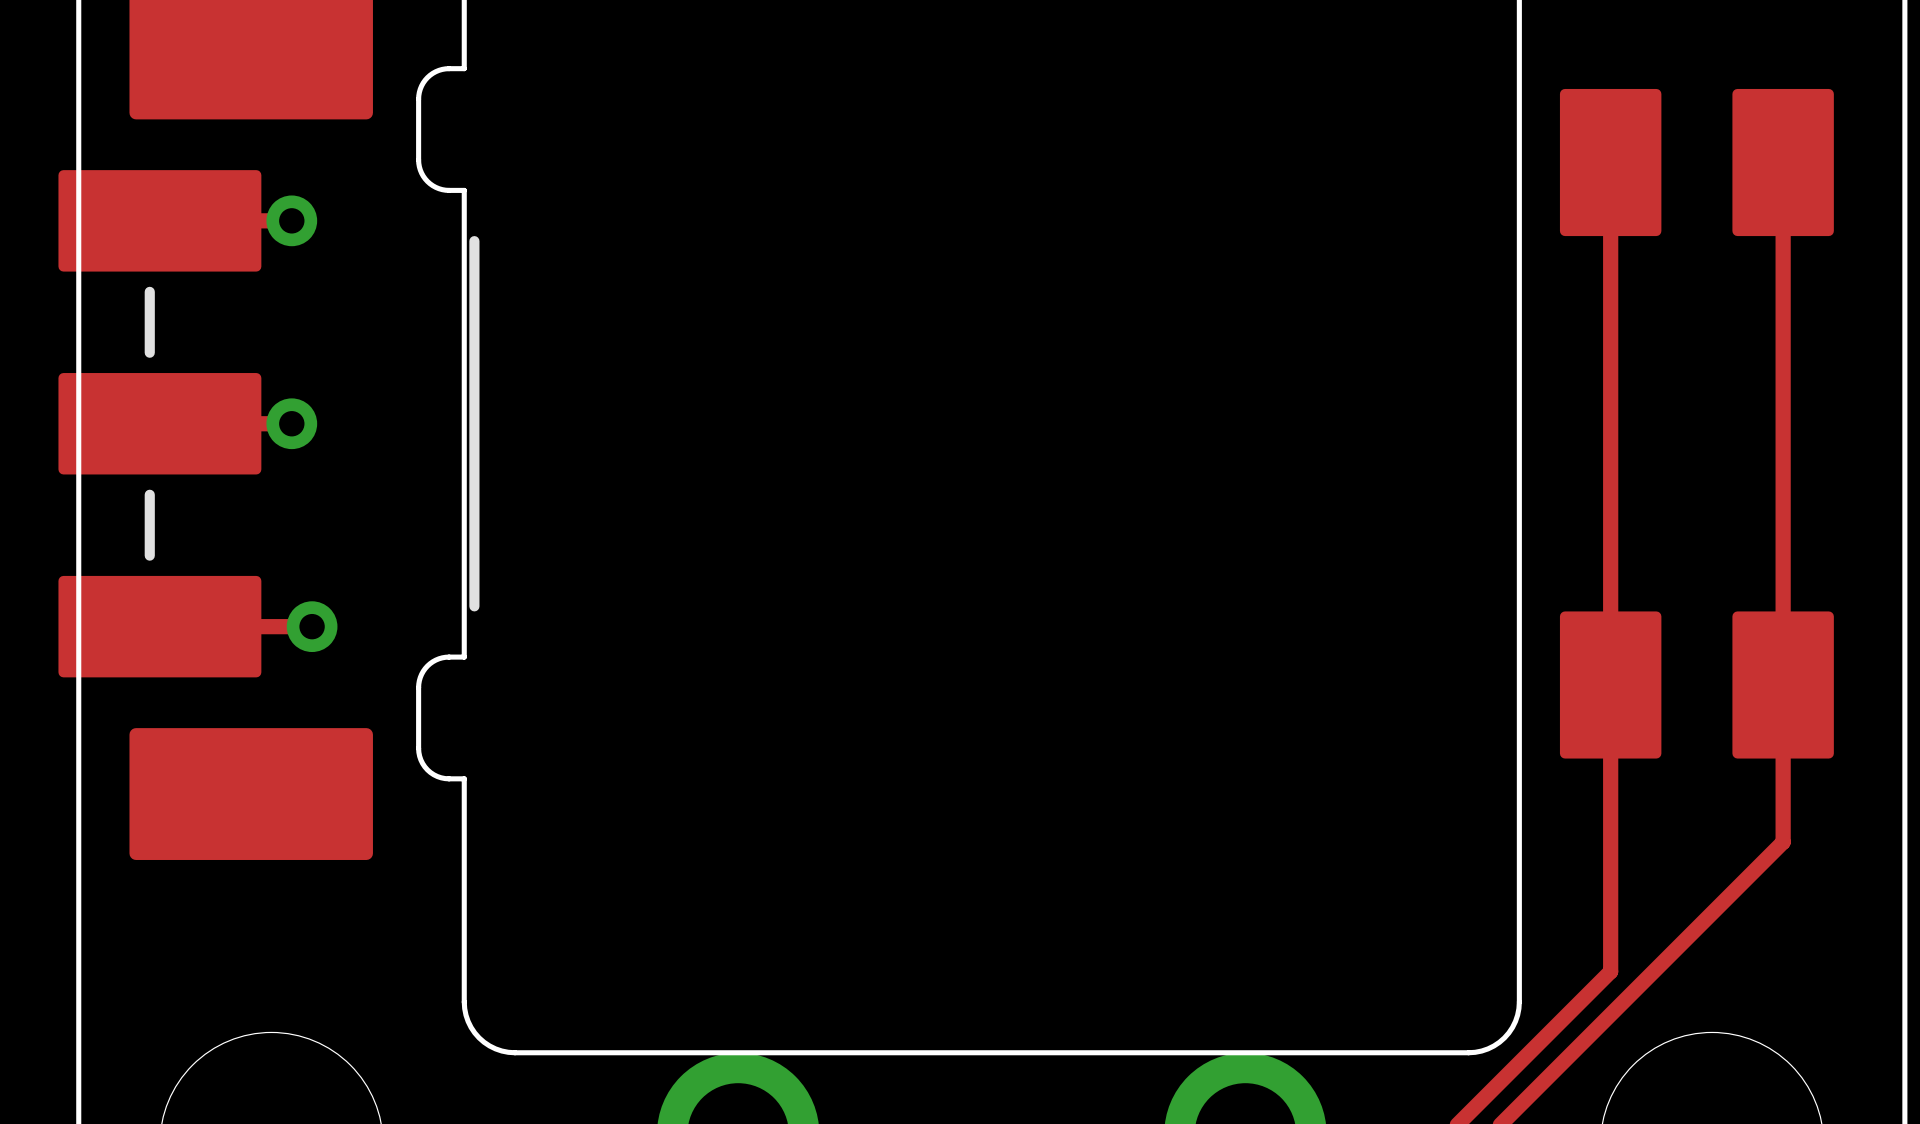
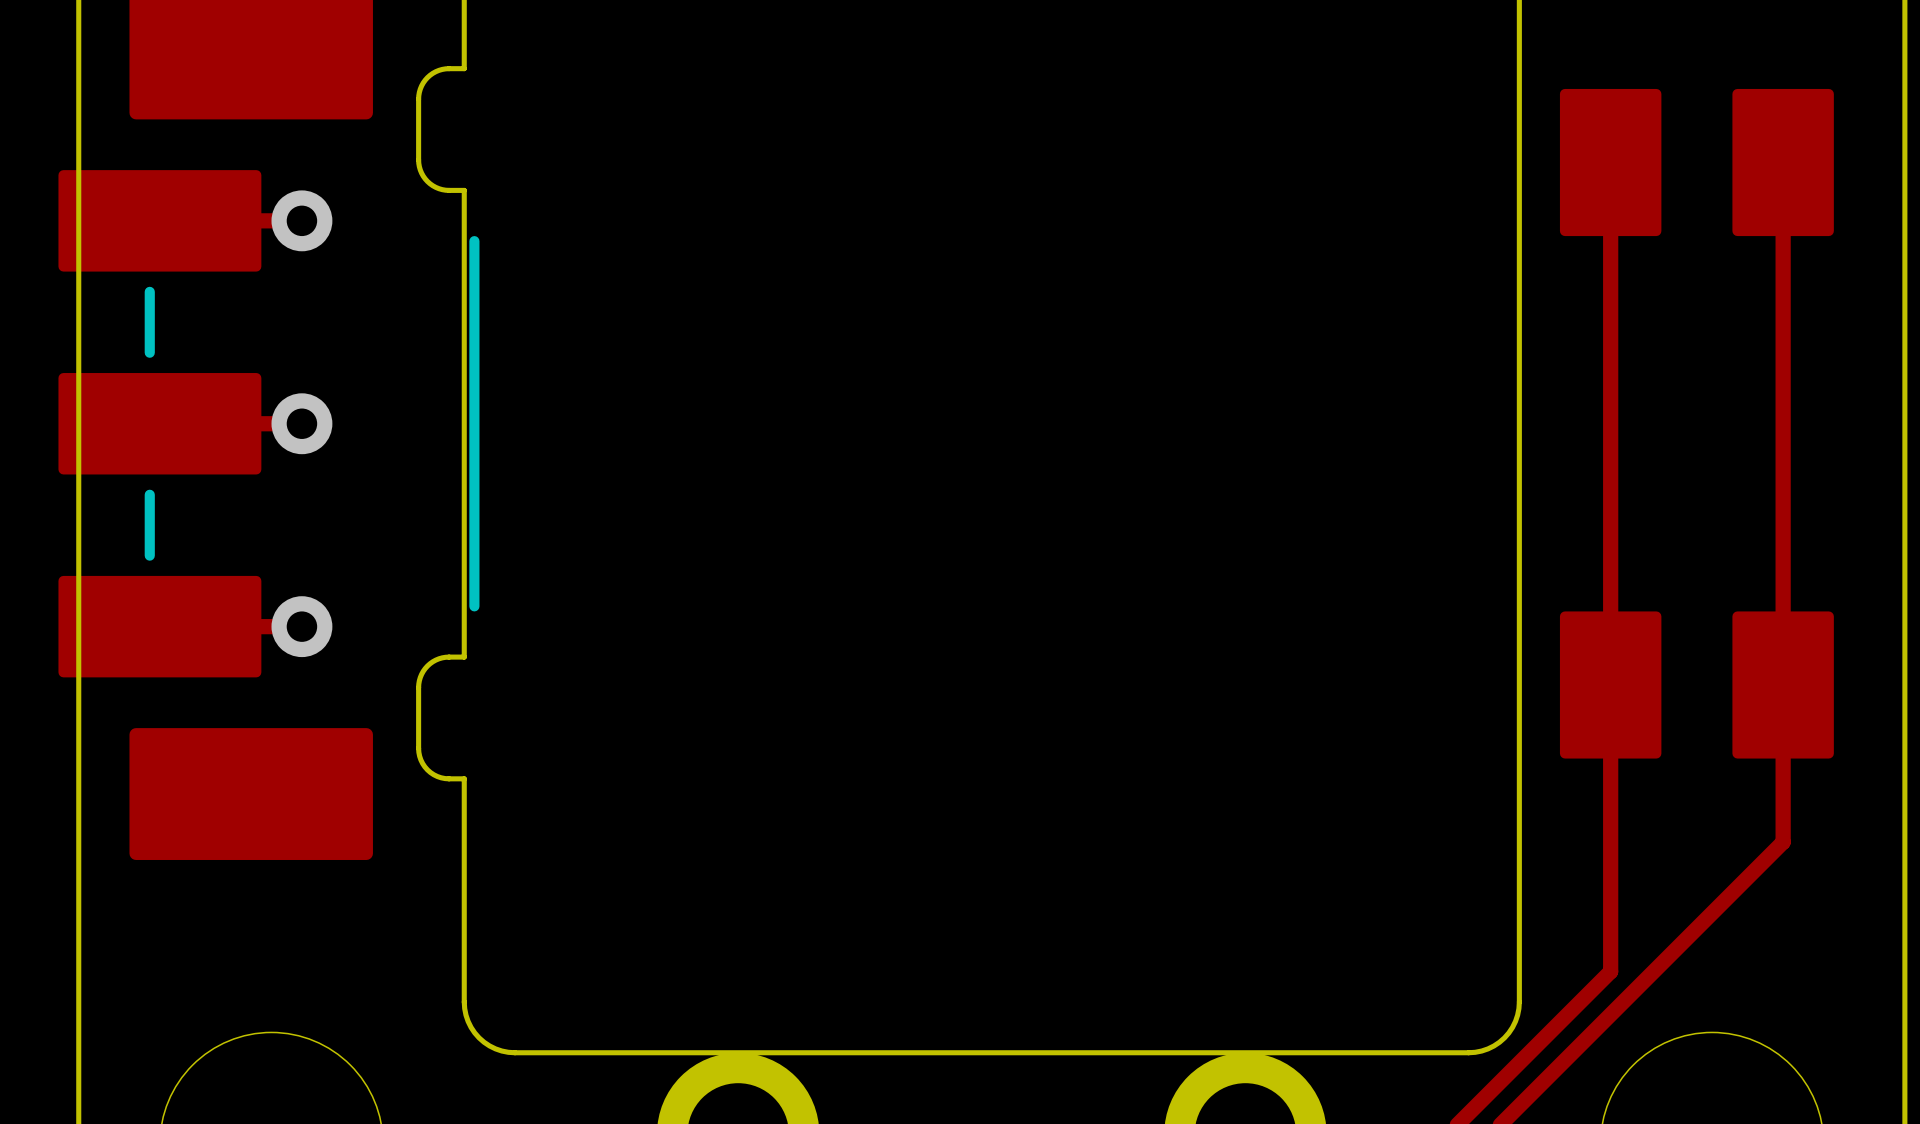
via size: [266, 195, 318, 247] -> [271, 190, 333, 252]
via size: [266, 398, 318, 450] -> [271, 393, 333, 455]
via size: [286, 601, 338, 653] -> [271, 596, 333, 658]

